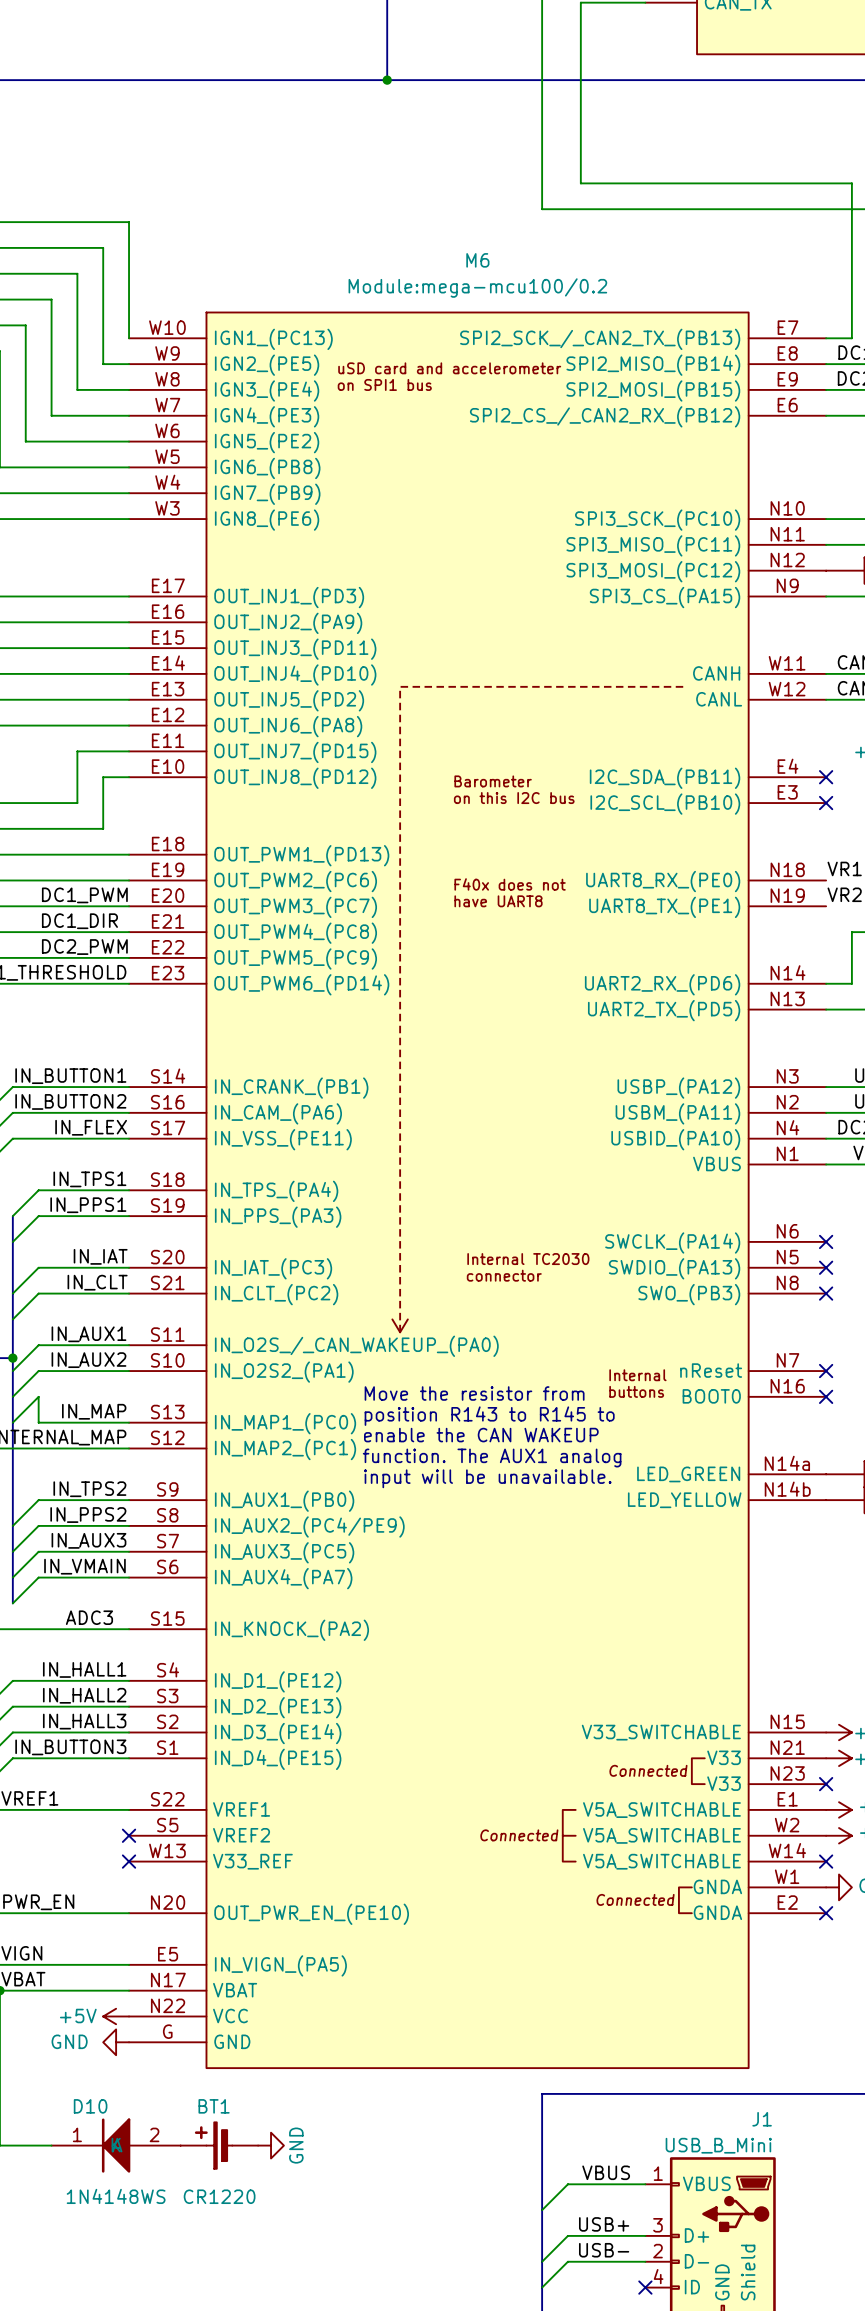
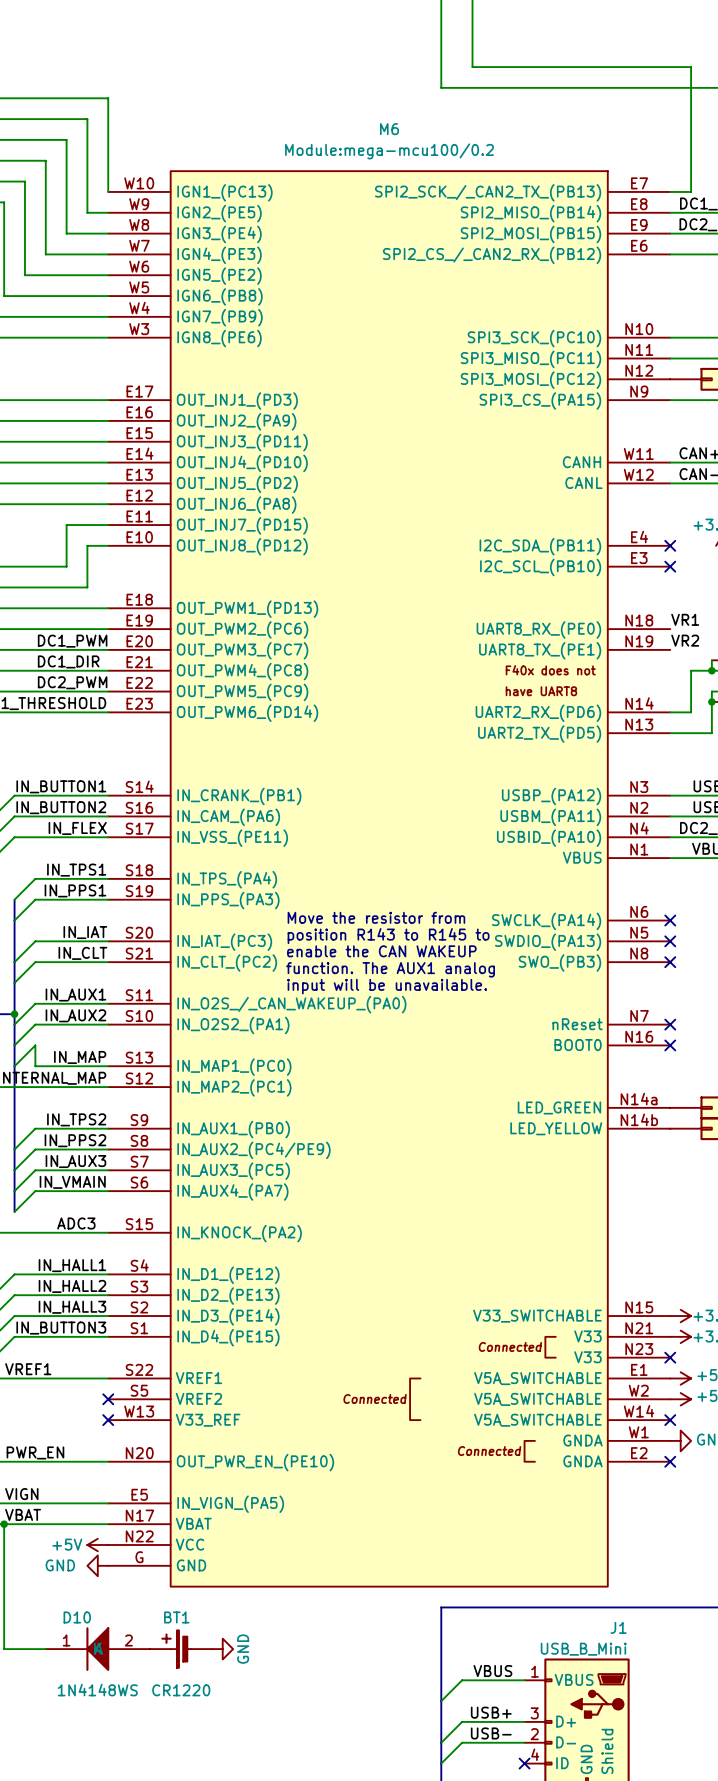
M6 symbol: [129, 312, 827, 2069] -> [108, 171, 671, 1587]
text position: Move the resistor from (474, 1393) -> Move the resistor from (376, 917)
text position: position R143 to R145 to (489, 1416) -> position R143 to R145 to (388, 936)
text position: enable the CAN WAKEUP (481, 1435) -> enable the CAN WAKEUP (381, 951)
text position: function. The AUX1 analog (492, 1458) -> function. The AUX1 analog (390, 969)
text position: input will be unavailable. (487, 1478) -> input will be unavailable. (387, 986)

